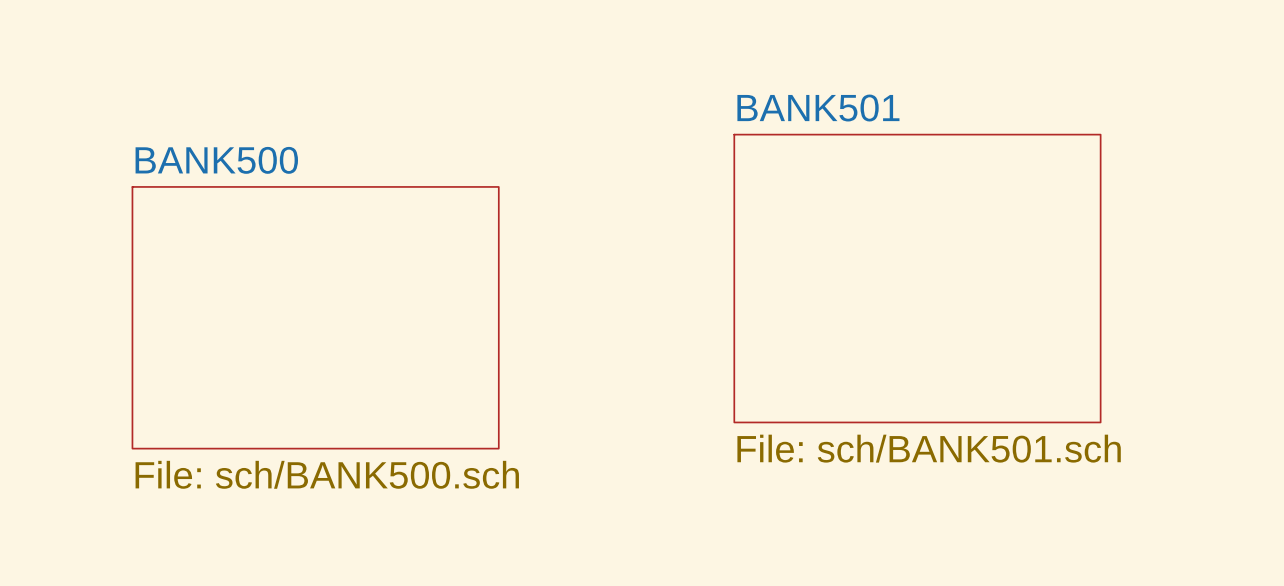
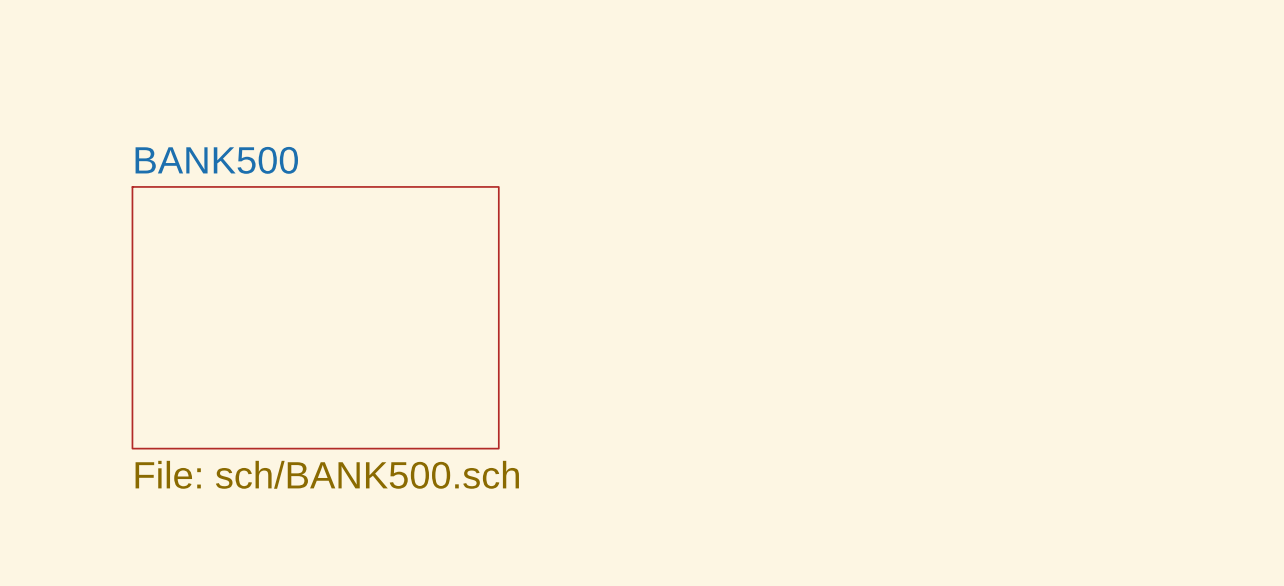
sheet BANK501: File: sch/BANK501.sch (917, 278) -> none

